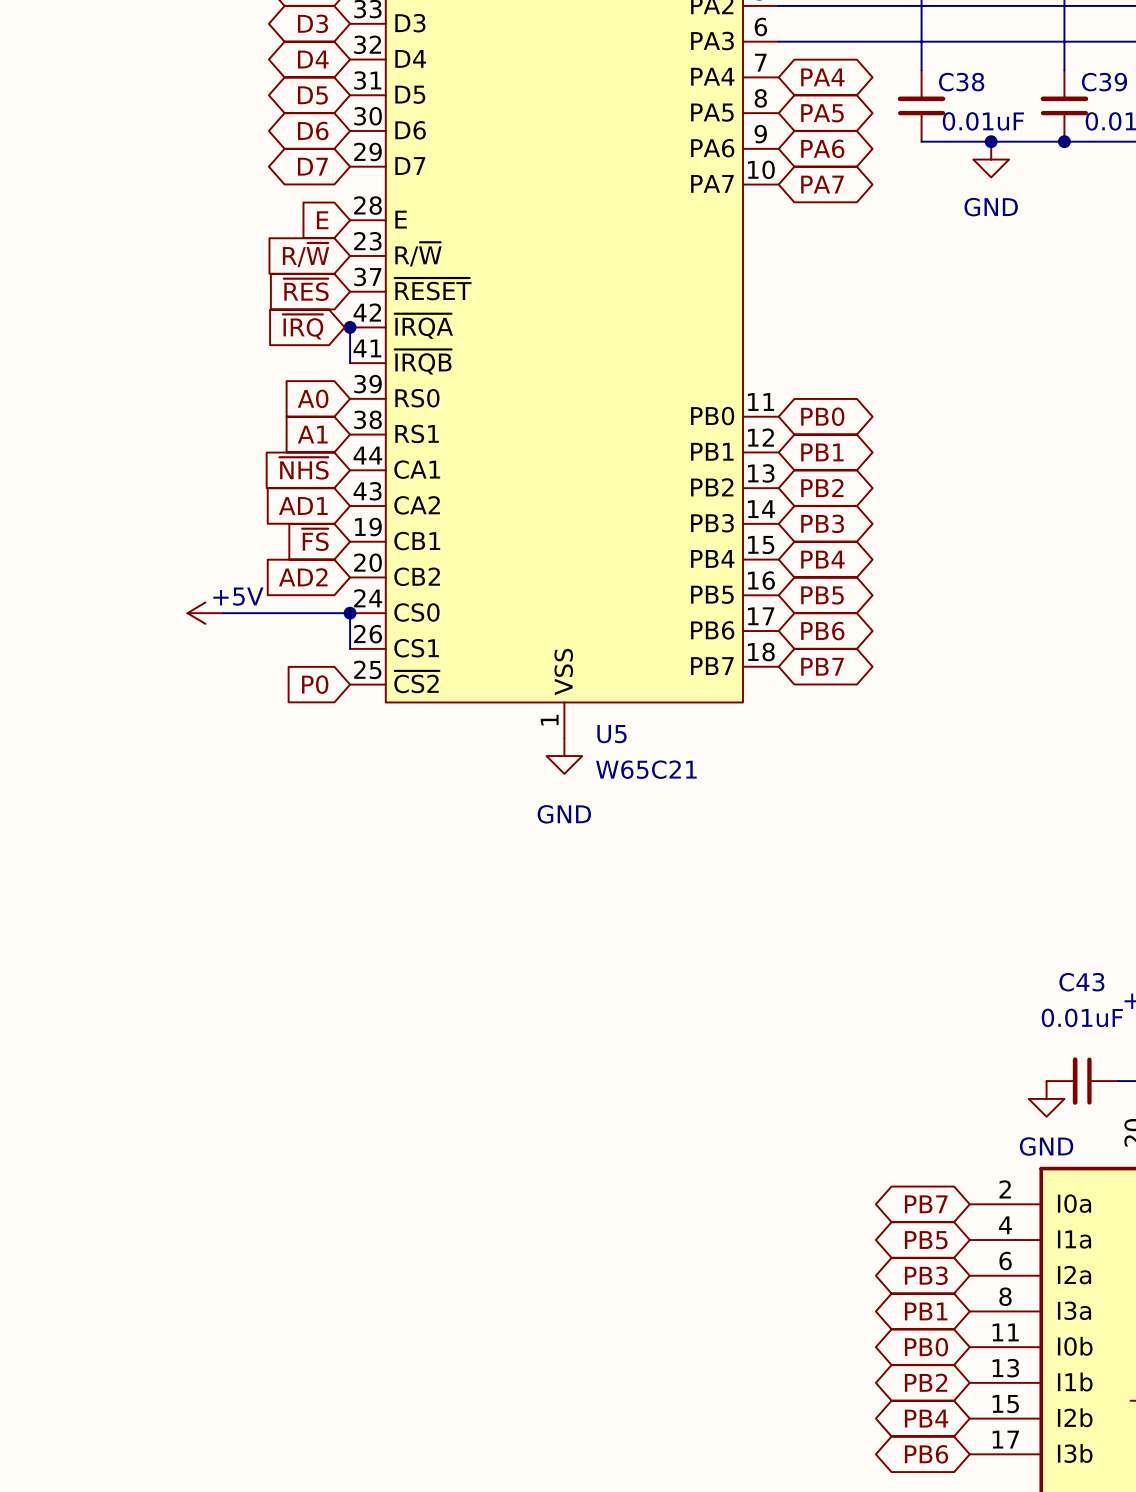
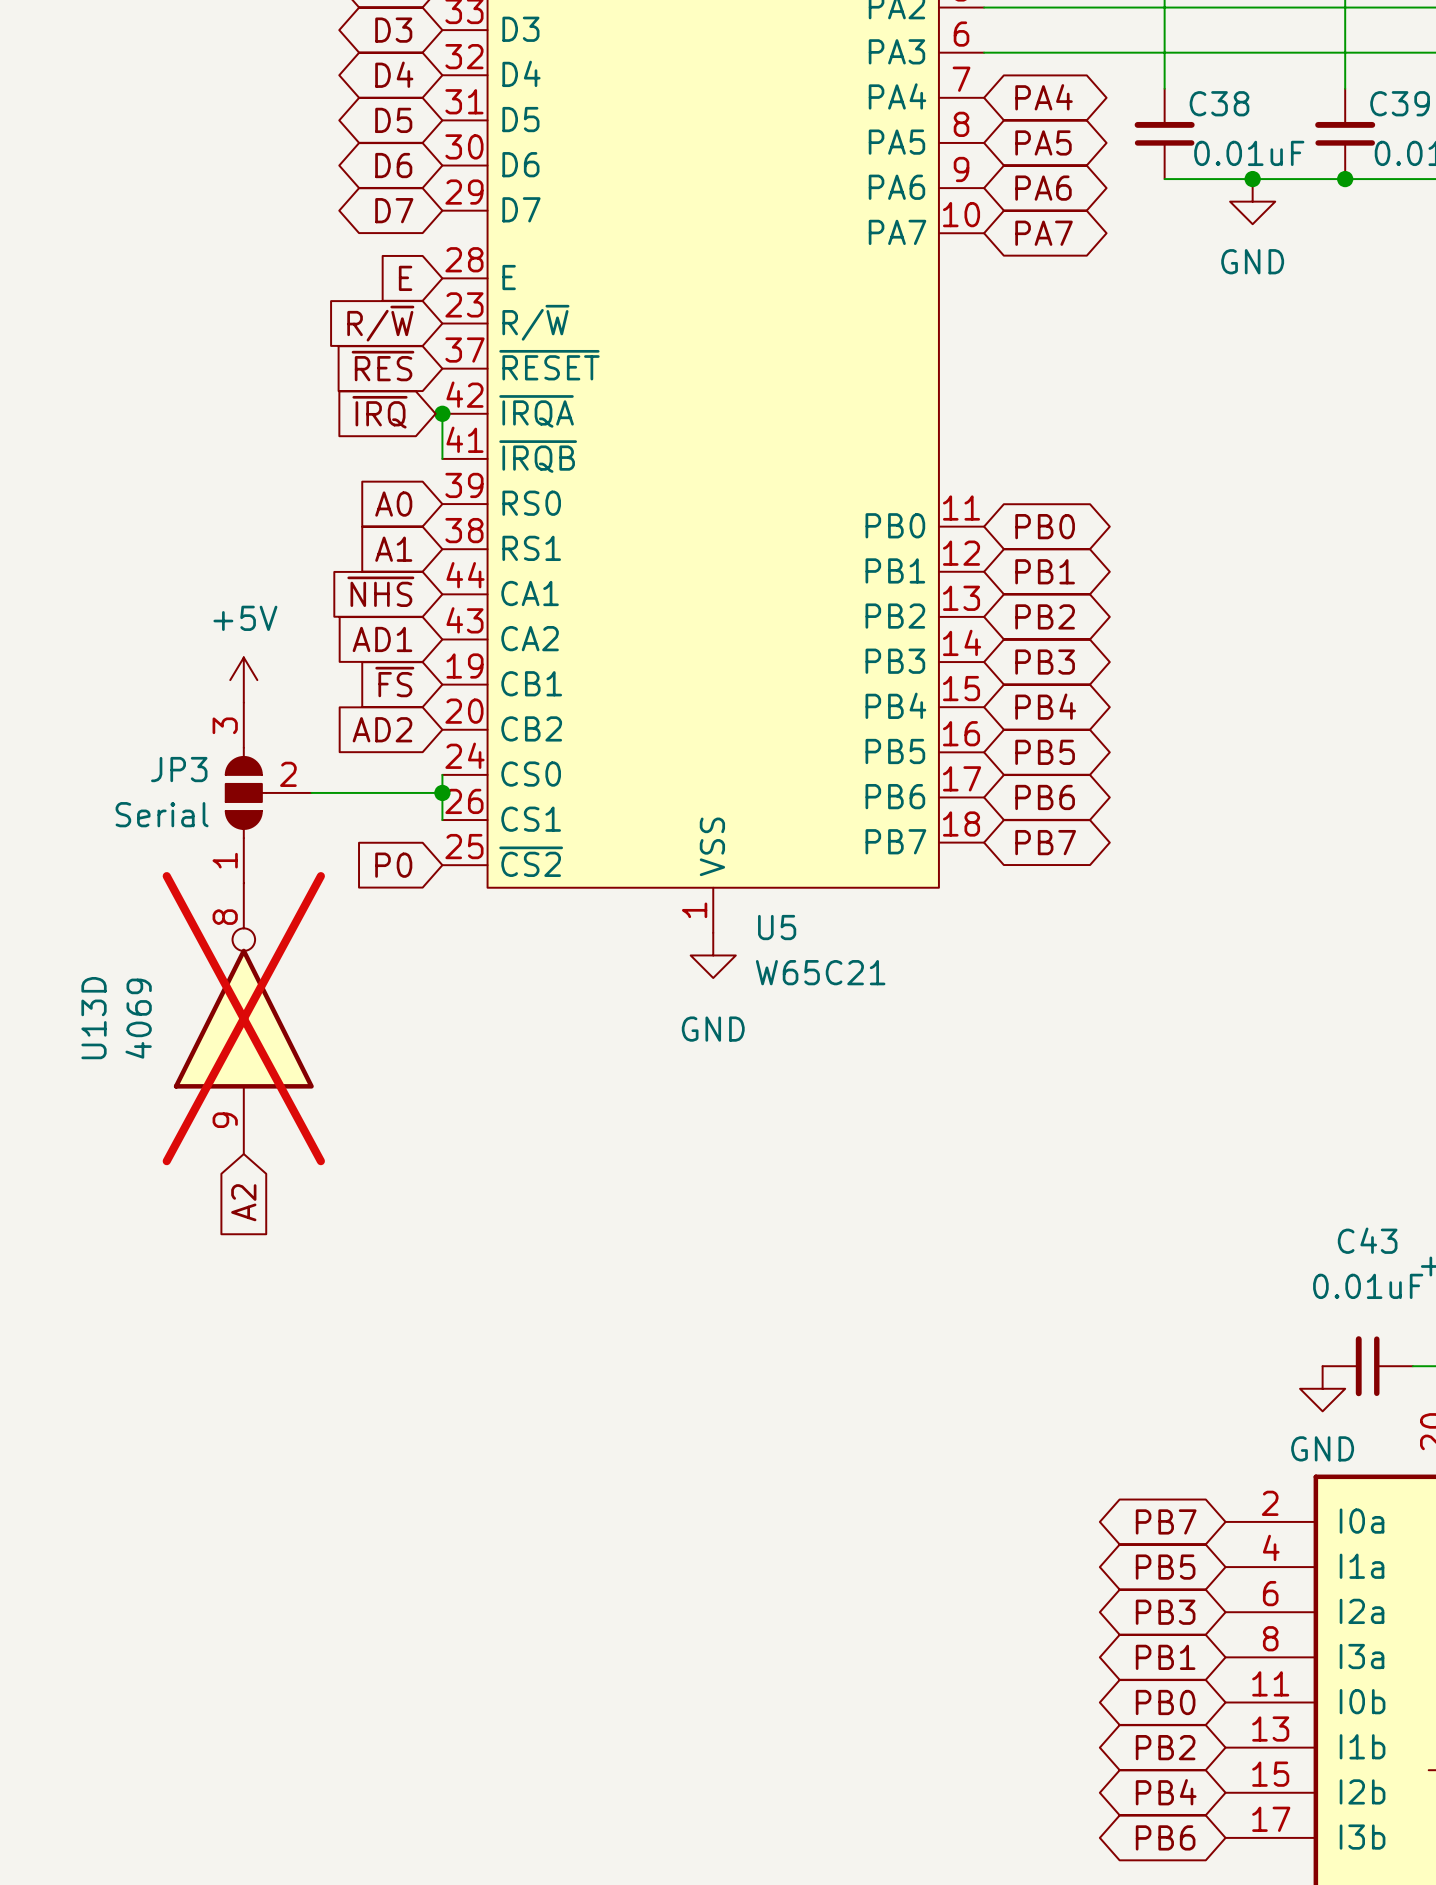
power symbol text position: +5V (238, 596) -> +5V (245, 618)
power symbol rotation: 0° (205, 613) -> 90° clockwise (243, 680)
power symbol position: +5V (205, 613) -> +5V (243, 680)
wire: (223, 613) (350, 613) -> none
junction position: (350, 613) -> (442, 792)
JP3: none -> Serial (268, 792)
wire: none -> (311, 792) (442, 792)
U13D: none -> 4069 (243, 1018)
global label: none -> A2 (243, 1202)

